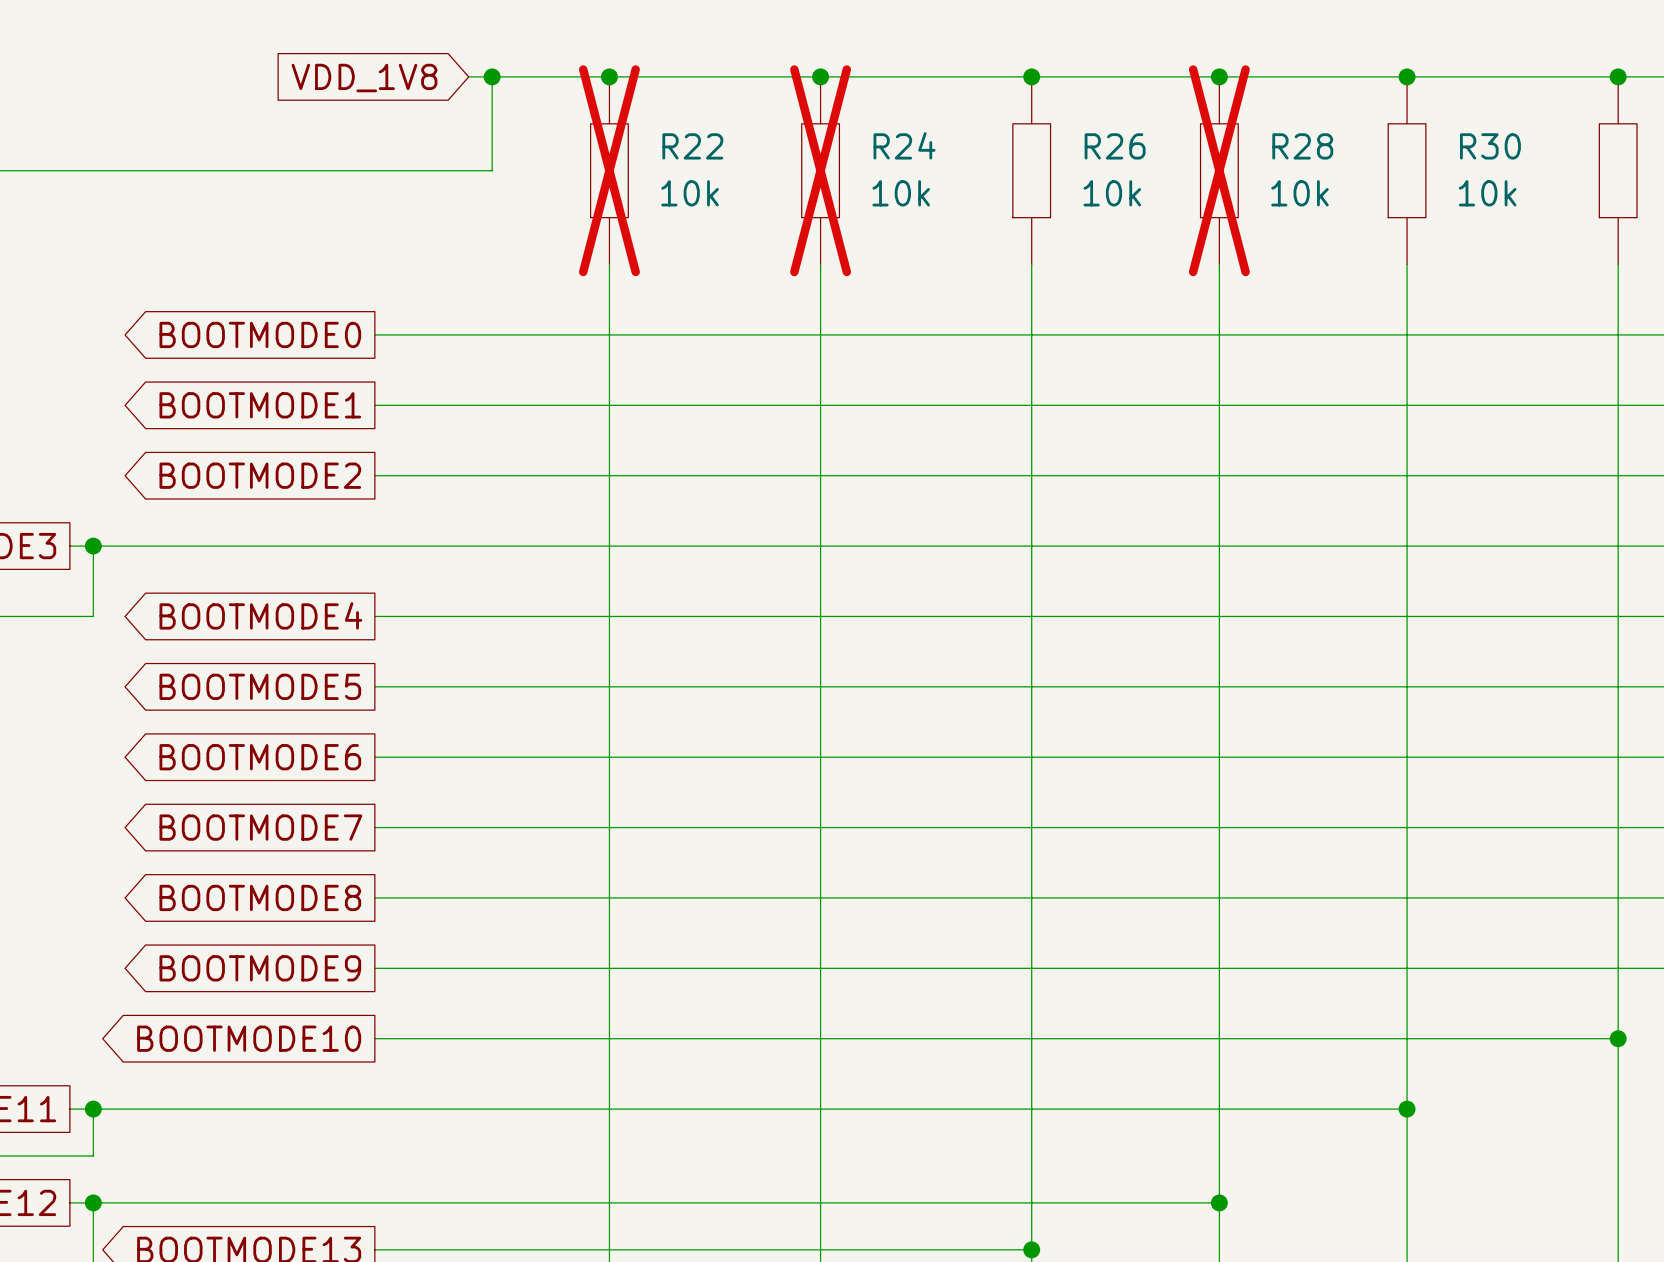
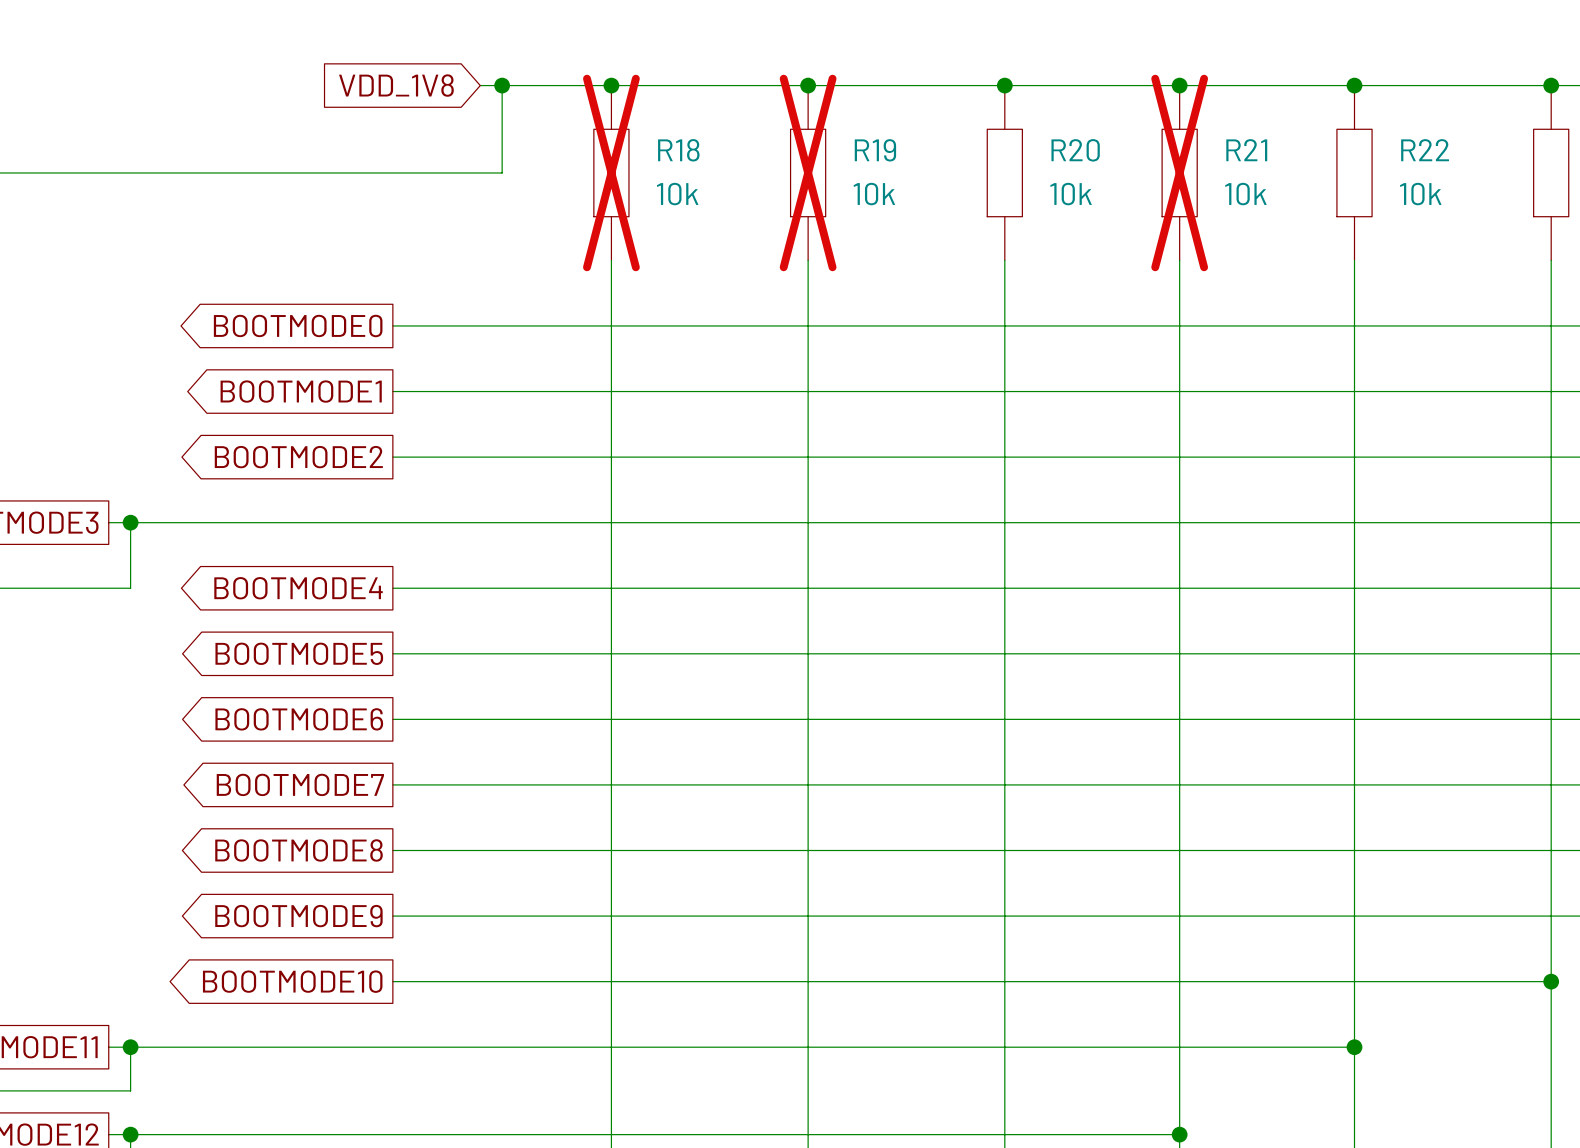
R24 name: R24 (904, 145) -> R19 (875, 150)
R22 name: R22 (692, 146) -> R18 (678, 150)
R26 name: R26 (1115, 146) -> R20 (1075, 150)
R28 name: R28 (1302, 146) -> R21 (1246, 150)
R30 name: R30 (1490, 146) -> R22 (1425, 150)

